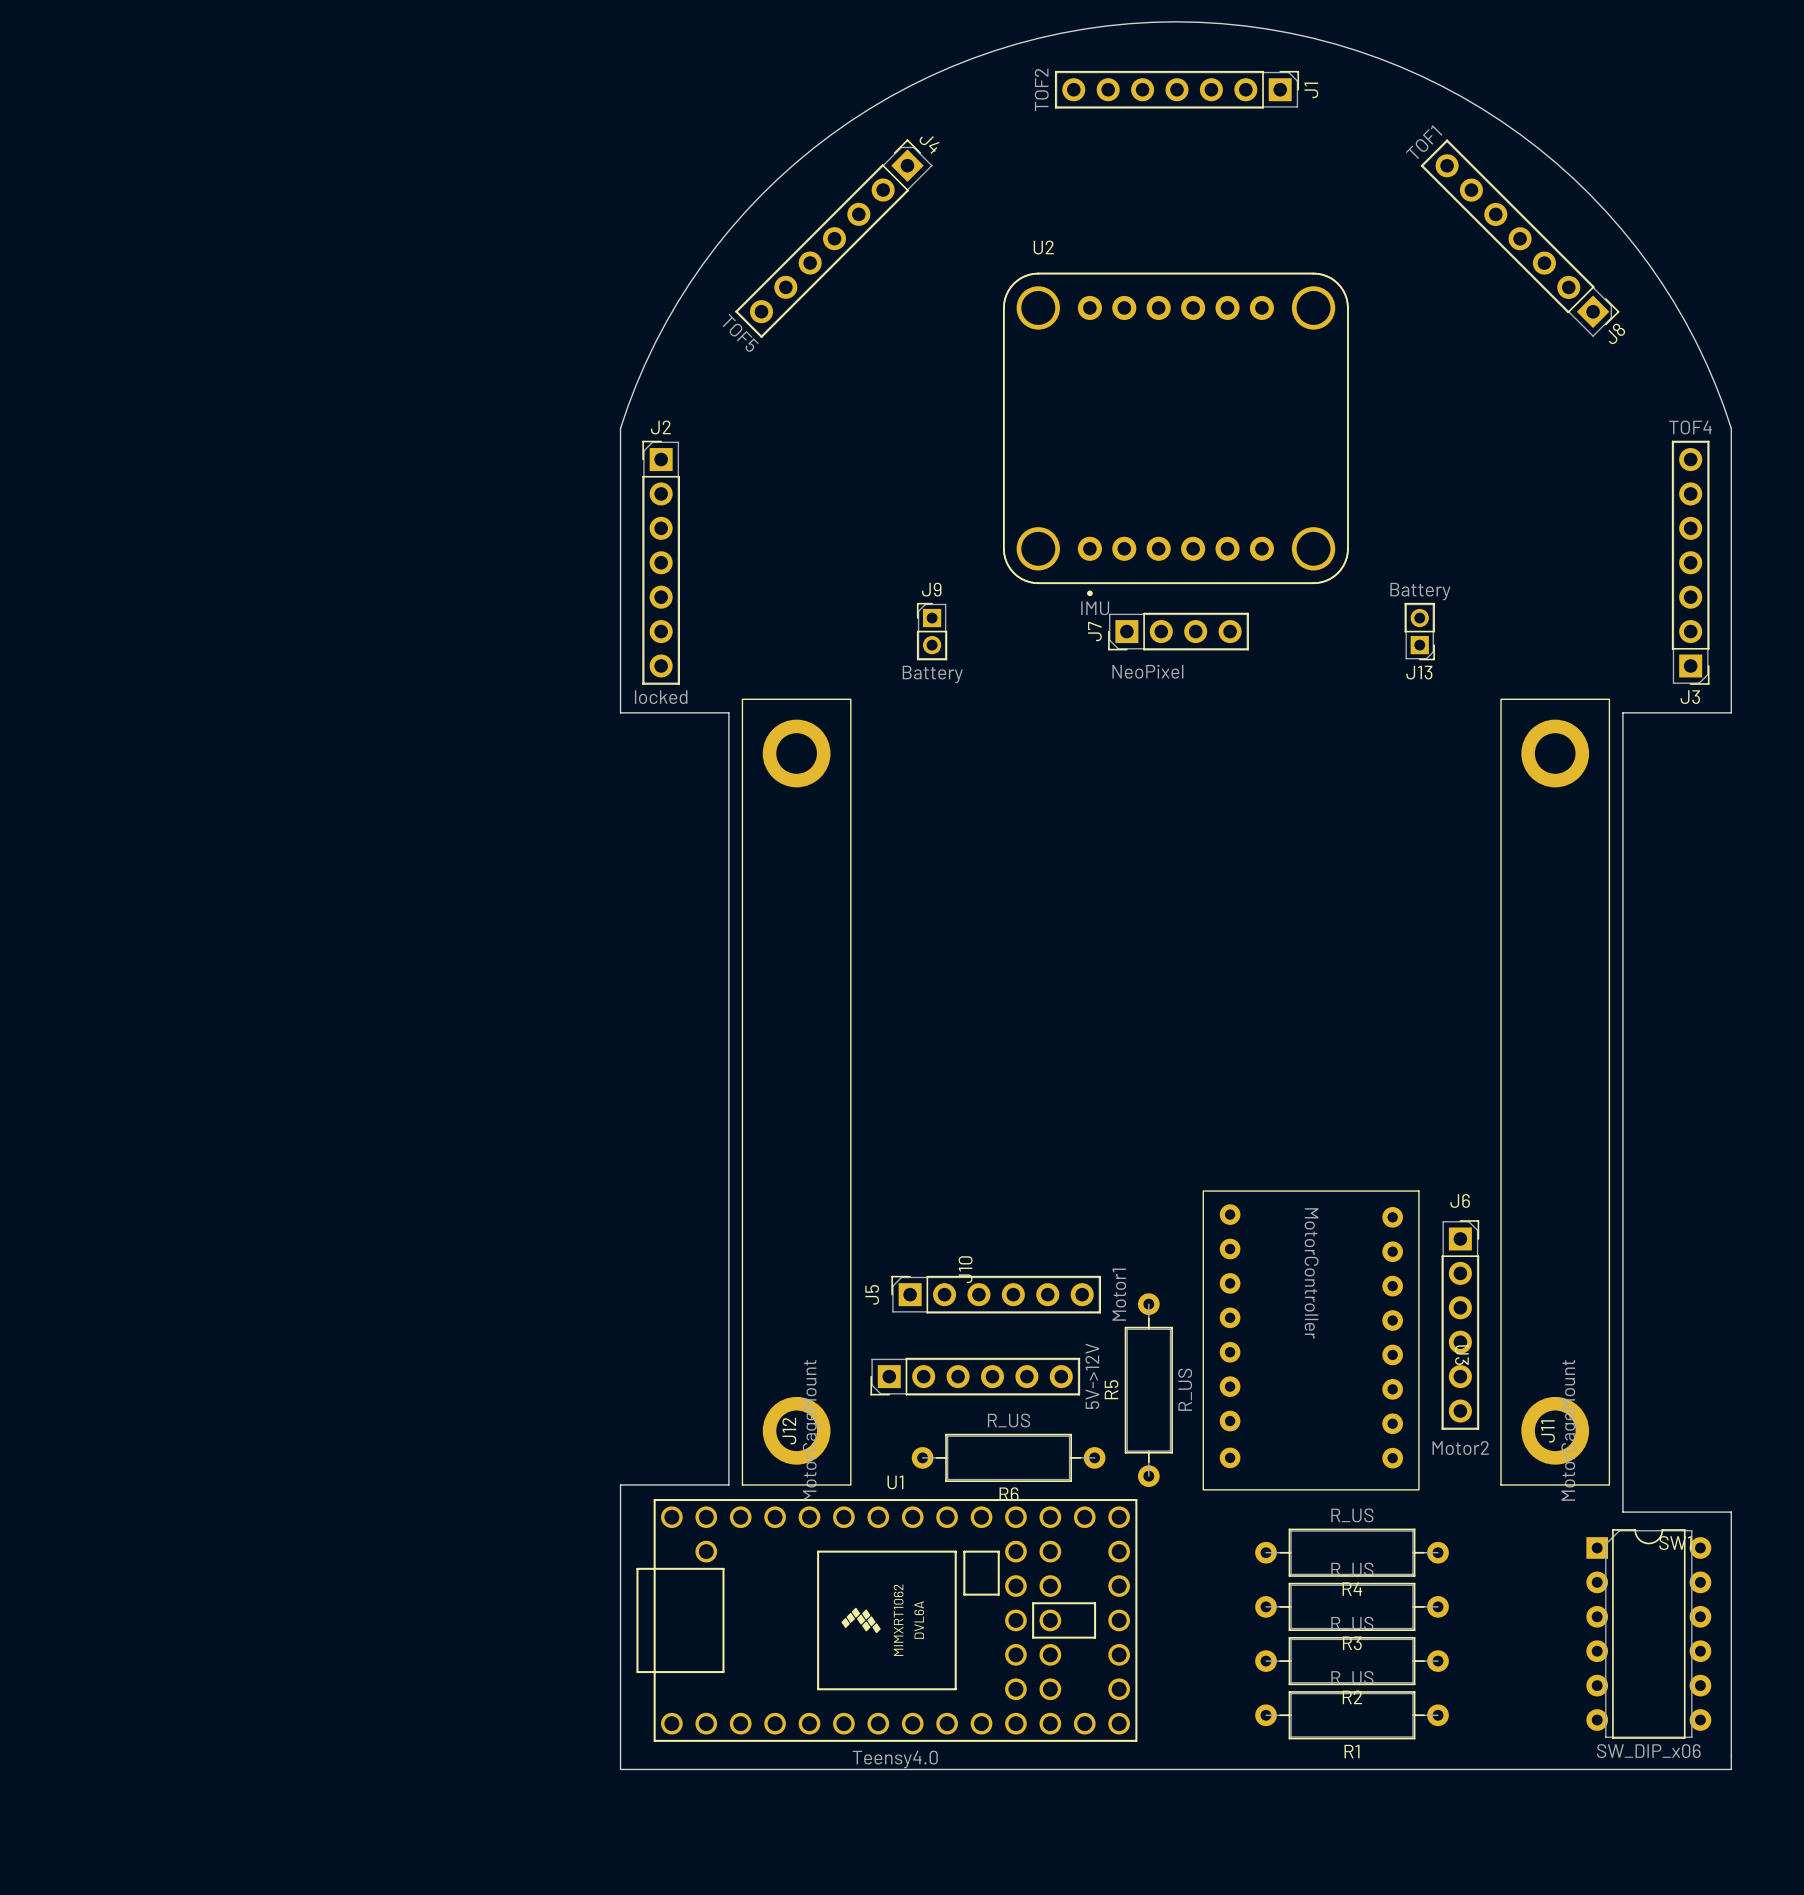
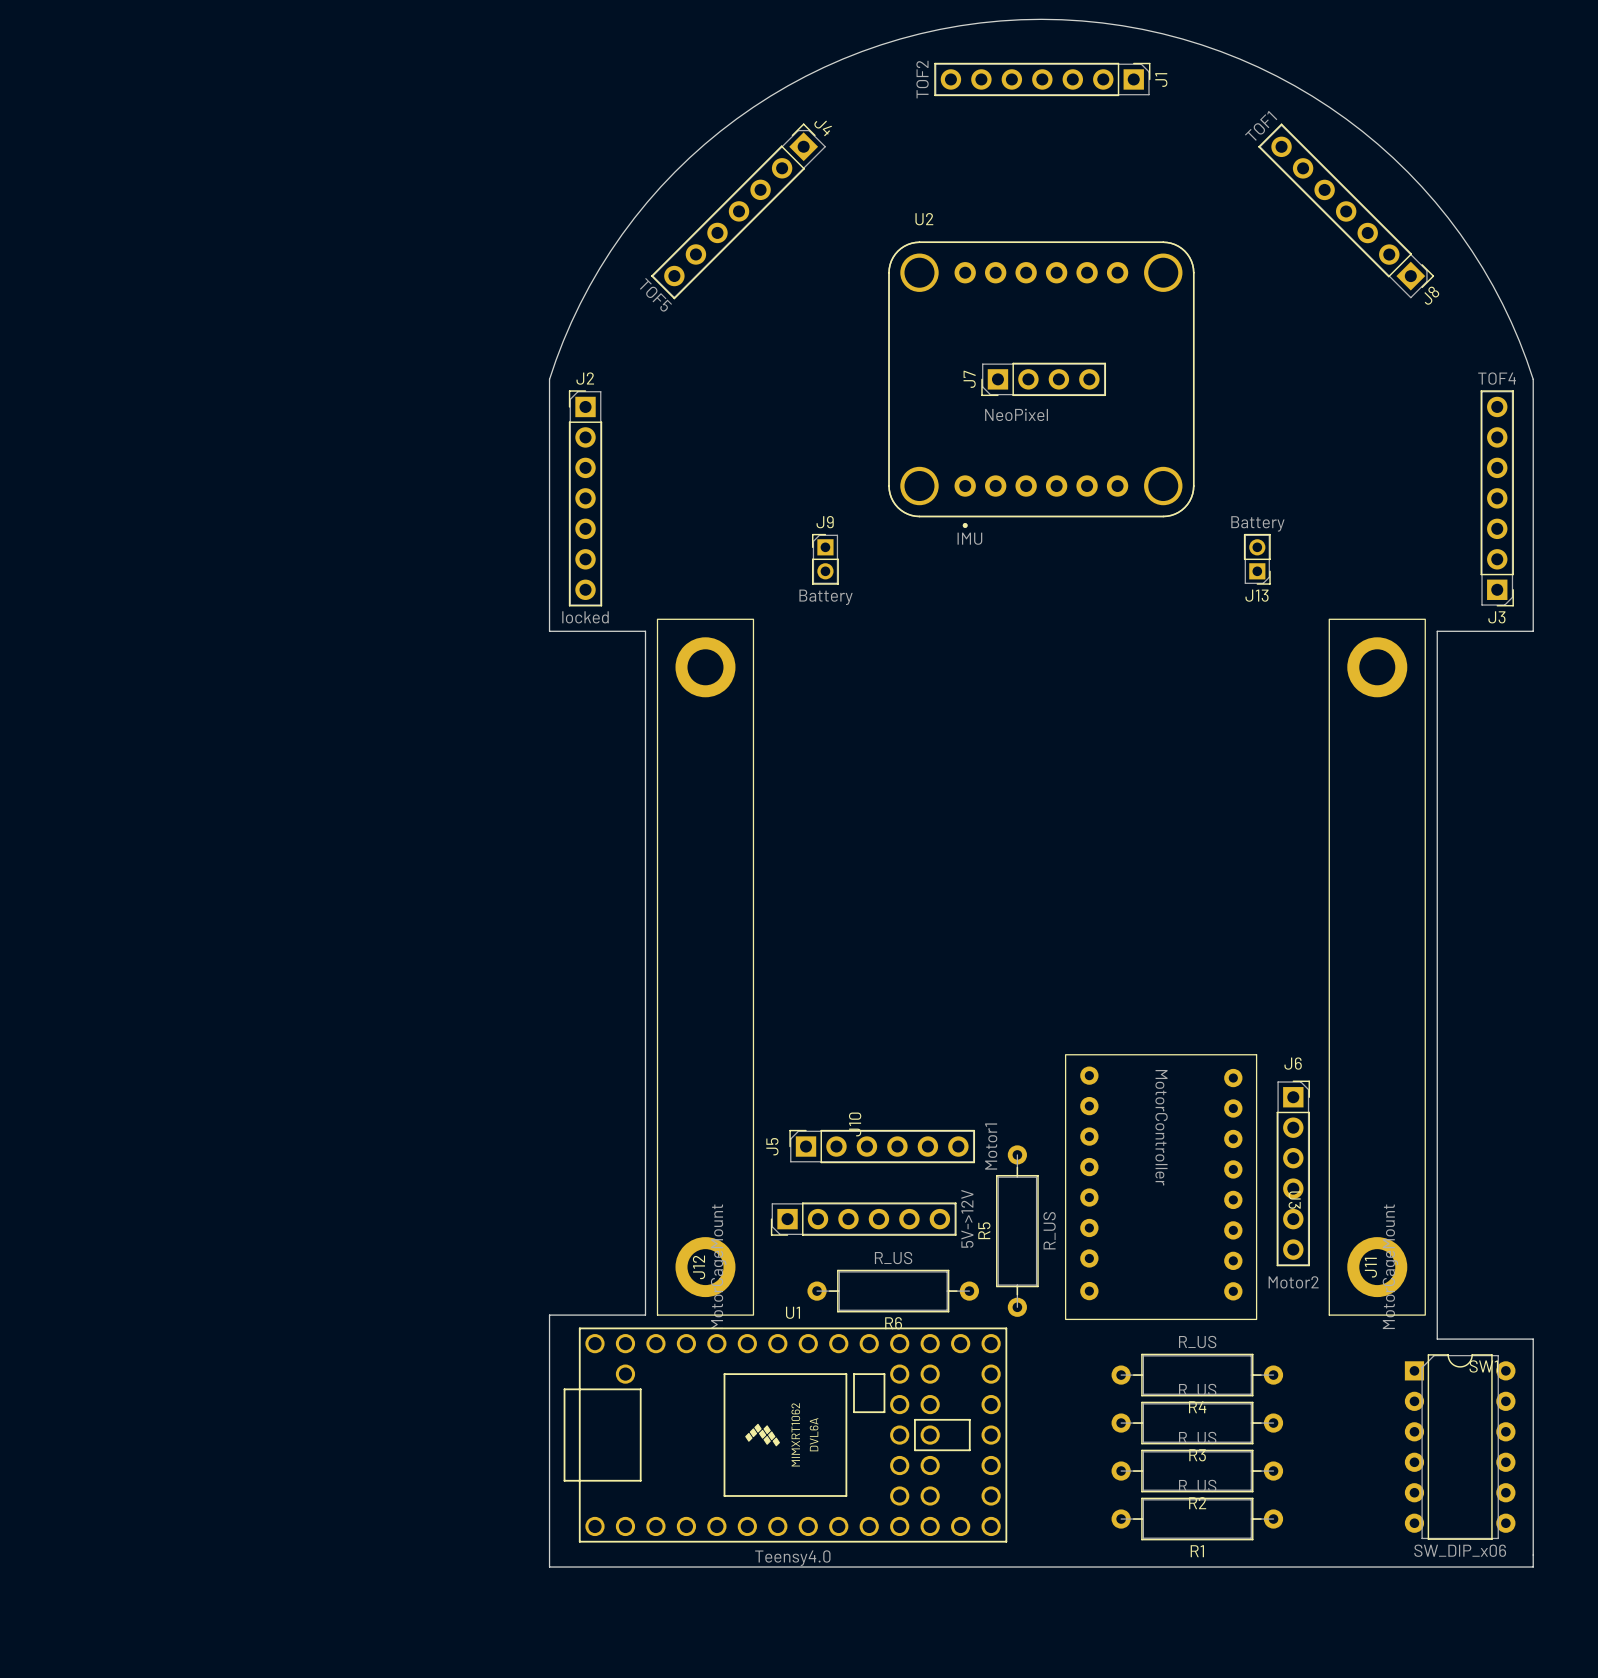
J7 position: (1178, 631) -> (1043, 379)

